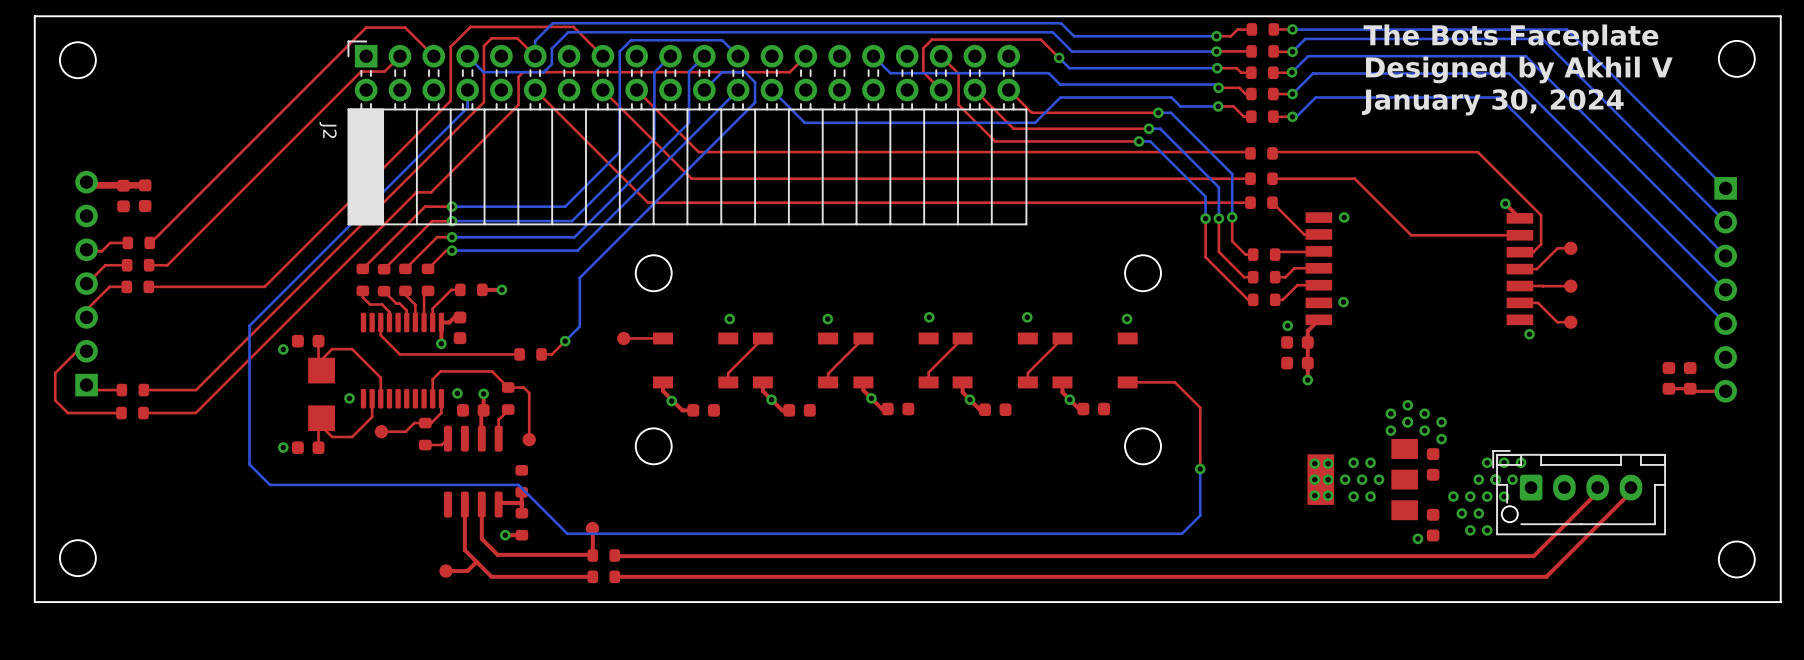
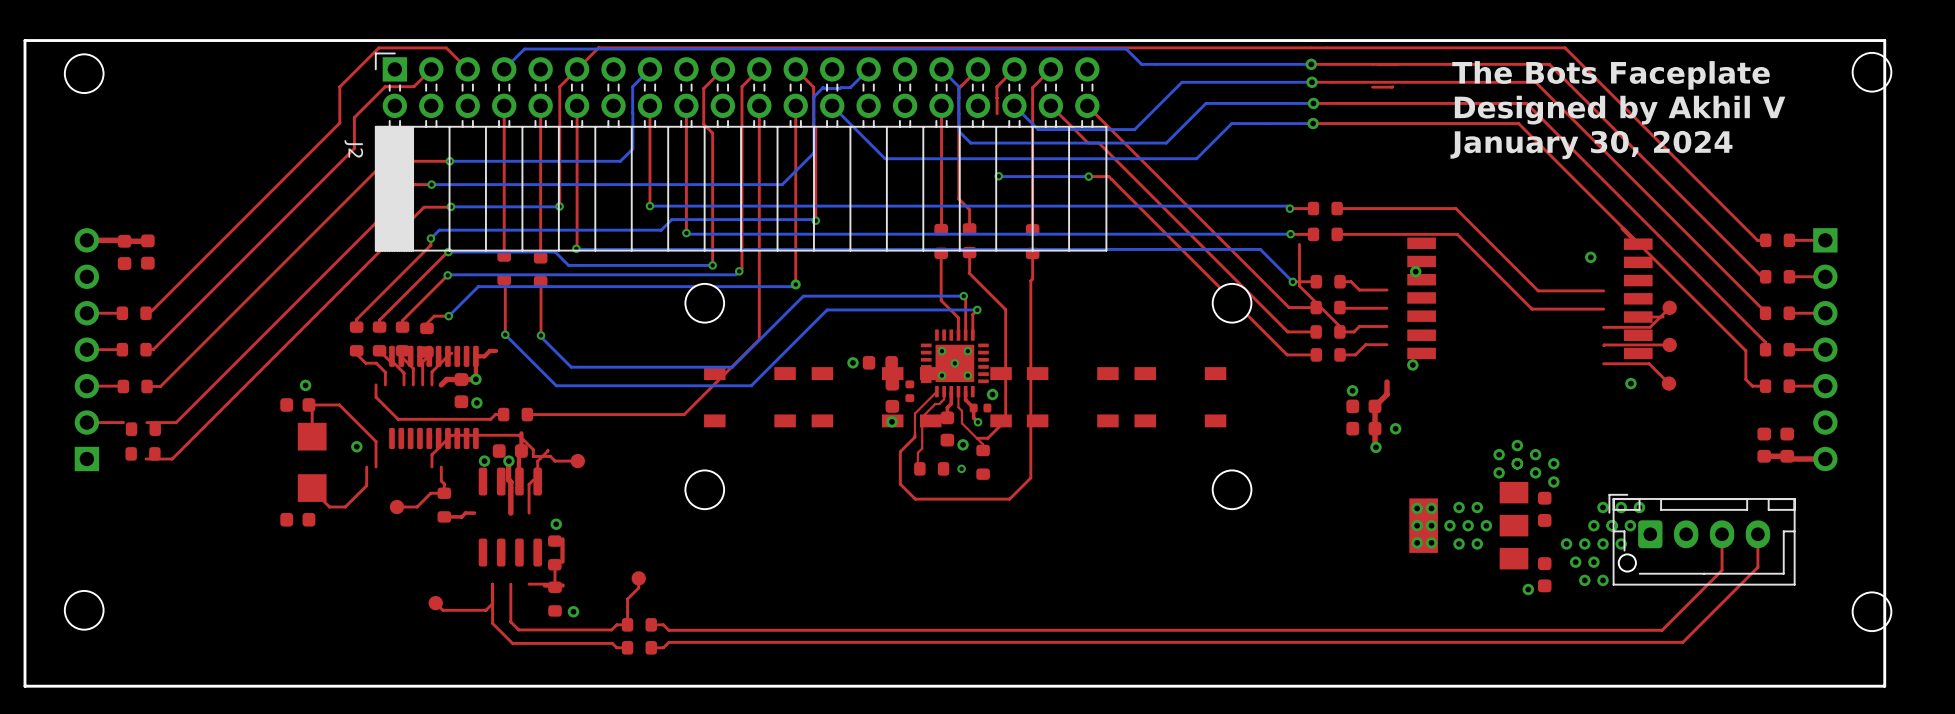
board edge: (1780, 16) (34, 16) (34, 602) (1780, 602) (1780, 16) -> (1884, 40) (1884, 686) (24, 686) (24, 40) (1884, 40)
top track: (1251, 29) (1237, 29) (1230, 36) -> (1765, 240) (1757, 240) (1565, 47) (1326, 47)
part: (1262, 29) -> none
bottom track: (1292, 29) (1566, 29) (1725, 188) -> none
via: (1292, 29) -> none
top track: (1296, 29) (1277, 29) -> none
top track: (413, 36) (405, 27) (366, 27) (149, 242) -> (446, 47) (378, 47) (339, 86) (339, 123) (149, 313) (146, 313)
top track: none -> (1311, 47) (598, 47) (559, 86) (559, 206)
bottom track: (1216, 36) (1074, 36) (1061, 23) (552, 23) (535, 40) (535, 56) -> none
via: (1216, 36) -> none
text position: The Bots Faceplate (1510, 37) -> The Bots Faceplate (1611, 75)
bottom track: (1072, 51) (1052, 32) (568, 32) (551, 48) (551, 64) (543, 72) (483, 72) (467, 56) -> (1155, 64) (1141, 64) (1126, 49) (524, 49) (504, 69)
top track: (1251, 51) (1216, 51) -> (1765, 276) (1761, 276) (1549, 64) (1311, 64)
part: (1262, 51) -> none
bottom track: (1292, 51) (1305, 38) (1542, 38) (1725, 222) -> none
via: (1292, 51) -> none
top track: (535, 56) (517, 38) (491, 38) (483, 45) (483, 102) (196, 390) (143, 390) -> none
top track: (602, 56) (573, 26) (470, 26) (450, 46) (450, 100) (264, 286) (148, 286) -> none
bottom track: none -> (649, 69) (632, 86) (632, 112)
top track: none -> (722, 69) (703, 88) (703, 124) (712, 133) (712, 265)
bottom track: (670, 56) (654, 72) (654, 138) (572, 221) (452, 221) -> none
top track: none -> (759, 69) (741, 86) (741, 268) (739, 271)
bottom track: (704, 56) (689, 71) (689, 122) (574, 237) (452, 237) -> none
top track: none -> (795, 69) (813, 87) (813, 125) (815, 128) (815, 220)
bottom track: (738, 56) (722, 40) (631, 40) (619, 51) (619, 152) (565, 206) (454, 206) -> none
top track: (805, 56) (789, 72) (523, 72) (518, 76) (518, 104) (431, 192) (416, 192) (195, 413) (143, 413) -> none
top track: none -> (977, 69) (958, 88) (958, 199) (969, 209) (969, 228)
top track: (941, 56) (958, 73) (958, 104) (995, 141) (1139, 141) -> (1014, 69) (996, 86) (996, 97)
top track: none -> (1050, 69) (1032, 87) (1032, 229)
top track: (1059, 57) (1040, 39) (931, 39) (923, 48) (923, 72) (941, 90) -> none
bottom track: (1059, 57) (1069, 68) (1096, 68) -> (1014, 105) (1038, 129) (1134, 129) (1181, 82)
via: (1059, 57) -> none
top track: (1236, 68) (1241, 72) (1251, 72) -> (1333, 82) (1535, 82) (1765, 313)
text position: Designed by Akhil V (1519, 69) -> Designed by Akhil V (1620, 110)
top track: (384, 71) (361, 71) (167, 265) (149, 265) -> (414, 85) (385, 86) (354, 117) (354, 148) (153, 349) (146, 349)
bottom track: (889, 72) (1048, 73) (1060, 84) (1215, 84) (1218, 87) -> (959, 113) (959, 131) (970, 143) (1166, 143) (1206, 103) (1313, 103)
bottom track: none -> (959, 86) (959, 97)
part: (1262, 72) -> none
bottom track: (1292, 72) (1308, 56) (1525, 56) (1725, 256) -> none
via: (1292, 72) -> none
bottom track: (755, 82) (744, 72) (722, 72) (704, 90) -> (813, 97) (823, 87) (850, 87) (868, 69)
bottom track: none -> (958, 97) (958, 113)
top track: none -> (997, 97) (997, 113)
top track: (1239, 87) (1245, 94) (1251, 94) (1250, 92) -> (1336, 103) (1526, 103) (1765, 342) (1765, 349)
top track: none -> (504, 105) (504, 256)
bottom track: (467, 90) (467, 107) (249, 325) (249, 464) (269, 484) (518, 484) (567, 533) (1182, 533) (1200, 515) (1200, 468) -> none
top track: none -> (540, 105) (540, 257)
top track: (535, 90) (647, 202) (1250, 202) -> (577, 105) (576, 248)
top track: (602, 90) (691, 178) (1250, 178) -> (649, 105) (649, 206)
top track: (636, 90) (698, 152) (1250, 153) -> (686, 105) (686, 233)
top track: none -> (759, 105) (759, 339) (684, 414) (527, 414)
top track: none -> (795, 105) (795, 284)
bottom track: (738, 90) (577, 250) (452, 250) -> none
top track: none -> (941, 105) (941, 229)
top track: (1008, 90) (1031, 112) (1158, 112) -> (1087, 105) (1289, 307) (1316, 307)
part: (1262, 94) -> none
bottom track: (1292, 94) (1313, 73) (1509, 73) (1725, 289) -> none
via: (1292, 94) -> none
top track: (1296, 94) (1274, 94) -> (1313, 208) (1290, 208)
bottom track: none -> (632, 113) (632, 148) (620, 161) (449, 161)
bottom track: (755, 102) (579, 277) (579, 326) (565, 341) -> (813, 119) (813, 152) (782, 184) (431, 184)
text position: January 30, 2024 (1492, 102) -> January 30, 2024 (1591, 145)
bottom track: (1180, 106) (1171, 97) (1060, 97) (1035, 122) (804, 122) -> (1272, 123) (1231, 123) (1196, 158) (885, 158) (867, 141)
top track: (1233, 106) (1243, 116) (1251, 116) -> (1329, 123) (1518, 123) (1745, 350) (1745, 379) (1752, 386) (1765, 386)
bottom track: (1158, 112) (1170, 112) (1232, 174) (1232, 217) -> none
via: (1158, 112) -> none
part: (1262, 116) -> none
via: (1292, 116) -> none
top track: (1296, 116) (1278, 116) -> none
bottom track: (1296, 116) (1315, 97) (1499, 97) (1725, 323) -> none
top track: (1009, 124) (1013, 128) (1149, 128) -> (1088, 143) (1098, 143) (1287, 331) (1316, 331)
bottom track: (1149, 128) (1160, 128) (1218, 187) (1218, 218) -> none
via: (1149, 128) -> none
top track: none -> (449, 161) (385, 161) (160, 386) (147, 386)
via: none -> (449, 161)
bottom track: (1139, 141) (1150, 141) (1205, 196) (1205, 218) -> none
via: (1139, 141) -> none
part: (1261, 153) -> none
top track: (1272, 153) (1477, 152) (1541, 215) (1541, 244) (1533, 252) (1519, 252) -> none
bottom track: none -> (998, 176) (1088, 176)
via: none -> (998, 176)
top track: none -> (1088, 176) (1108, 176) (1287, 354) (1316, 354)
via: none -> (1088, 176)
top track: none -> (431, 184) (414, 184) (176, 422) (146, 422)
via: none -> (431, 184)
part: (1261, 178) -> none
top track: (1272, 178) (1354, 178) (1411, 235) (1519, 235) -> none
top track: (86, 182) (89, 185) (145, 185) -> none
top track: none -> (450, 206) (424, 207) (172, 459) (146, 459)
via: none -> (450, 206)
bottom track: none -> (559, 206) (450, 206)
via: none -> (559, 206)
bottom track: none -> (649, 206) (1287, 206) (1289, 208)
via: none -> (649, 206)
via: none -> (1289, 208)
part: none -> (1325, 208)
top track: none -> (1337, 208) (1455, 208) (1538, 290) (1603, 290)
part: (145, 195) -> none
part: (123, 196) -> none
bottom track: none -> (815, 220) (671, 219) (661, 230) (439, 230) (430, 238)
via: none -> (815, 220)
part: (1261, 202) -> none
top track: (1272, 202) (1304, 234) (1318, 234) -> none
via position: (1505, 203) -> (1590, 257)
via: (452, 206) -> none
top track: (454, 206) (425, 206) (362, 268) -> none
bottom track: none -> (686, 233) (1290, 234)
via: none -> (686, 233)
top track: none -> (1290, 234) (1313, 234)
via: none -> (1290, 234)
part: none -> (1325, 234)
top track: none -> (1337, 234) (1457, 234) (1532, 309) (1603, 309)
top track: none -> (430, 238) (430, 245) (356, 319) (356, 327)
via: none -> (430, 238)
top track: none -> (86, 240) (147, 240)
part: none -> (1777, 240)
top track: none -> (1825, 240) (1789, 240)
part: none -> (941, 241)
part: none -> (969, 240)
part: none -> (1032, 241)
top track: (1232, 217) (1232, 241) (1245, 254) (1253, 254) -> none
via: (1232, 217) -> none
via: (1344, 217) -> none
via: (1205, 218) -> none
top track: (1218, 218) (1218, 251) (1244, 277) (1253, 277) -> none
via: (1218, 218) -> none
top track: (451, 221) (432, 221) (384, 269) -> none
via: (452, 221) -> none
bottom track: none -> (576, 248) (1260, 249) (1292, 281)
via: none -> (576, 248)
part: none -> (147, 252)
top track: none -> (448, 252) (379, 320) (379, 327)
bottom track: none -> (448, 252) (555, 252) (568, 265) (712, 265)
via: none -> (448, 252)
part: none -> (124, 252)
top track: none -> (941, 253) (941, 300) (958, 317) (958, 335)
top track: none -> (969, 252) (969, 273) (1005, 309) (1005, 420) (987, 438) (976, 438)
top track: none -> (1032, 253) (1032, 279) (1030, 280) (1030, 477) (1009, 499) (915, 499) (900, 484) (900, 451) (914, 437) (914, 413) (936, 391)
top track: (452, 237) (437, 237) (405, 268) -> none
via: (452, 237) -> none
via: none -> (712, 265)
part: none -> (504, 267)
top track: (127, 242) (110, 242) (101, 251) (88, 251) -> none
part: (138, 242) -> none
part: none -> (540, 269)
bottom track: none -> (739, 271) (735, 274) (447, 275)
via: none -> (739, 271)
via: none -> (1415, 271)
top track: none -> (447, 275) (402, 320) (402, 327)
via: none -> (447, 275)
top track: (1570, 248) (1557, 248) (1536, 269) (1519, 269) -> none
part: (1570, 248) -> none
part: none -> (1777, 276)
top track: none -> (1825, 276) (1789, 276)
top track: (446, 250) (428, 268) -> none
via: (452, 250) -> none
top track: none -> (504, 279) (505, 334)
top track: (1318, 251) (1277, 251) (1275, 254) -> none
top track: none -> (540, 281) (541, 335)
via: none -> (1292, 281)
top track: none -> (1316, 281) (1293, 281)
part: none -> (1328, 281)
top track: none -> (1340, 281) (1351, 281) (1359, 290) (1387, 290)
part: (1264, 254) -> none
bottom track: none -> (795, 284) (793, 286) (478, 286) (448, 316)
via: none -> (795, 284)
top track: (127, 265) (105, 265) (86, 283) (89, 286) -> none
part: (138, 265) -> none
top track: none -> (963, 296) (965, 298) (965, 335)
bottom track: none -> (963, 296) (803, 296) (732, 367) (571, 367) (541, 335)
via: none -> (963, 296)
top track: (1318, 268) (1294, 268) (1285, 277) (1275, 277) -> none
part: none -> (1328, 307)
top track: none -> (1339, 307) (1387, 308)
part: (1264, 277) -> none
top track: none -> (1669, 307) (1650, 327) (1603, 327)
part: none -> (1669, 307)
part: (362, 279) -> none
part: (405, 279) -> none
part: (428, 279) -> none
top track: none -> (977, 309) (972, 314) (972, 335)
bottom track: none -> (977, 309) (827, 309) (751, 385) (556, 385) (505, 334)
via: none -> (977, 309)
part: (384, 280) -> none
top track: none -> (122, 313) (86, 313)
part: none -> (134, 313)
part: none -> (1777, 313)
top track: none -> (1825, 313) (1789, 313)
part position: (86, 283) -> (86, 349)
top track: none -> (448, 316) (434, 316) (426, 323) (426, 328)
via: none -> (448, 316)
top track: (1318, 285) (1297, 285) (1282, 299) (1275, 299) -> none
top track: (126, 286) (109, 286) (86, 309) (86, 317) (88, 319) -> none
part: (137, 286) -> none
top track: (1570, 286) (1543, 286) -> none
part: (1570, 286) -> none
top track: (460, 289) (451, 289) (432, 308) (432, 322) -> none
part: (471, 289) -> none
top track: (501, 289) (482, 289) -> none
via: (501, 289) -> none
part position: (1725, 289) -> (1825, 349)
top track: (362, 290) (362, 297) (370, 304) (382, 304) (389, 311) (389, 322) -> none
top track: (405, 290) (405, 294) (415, 304) (415, 322) -> none
top track: (428, 290) (424, 294) (424, 322) -> none
top track: (384, 291) (406, 310) (406, 322) -> none
top track: none -> (1387, 326) (1359, 326) (1354, 331) (1350, 331)
part: none -> (1328, 331)
part: (1264, 299) -> none
via: none -> (505, 334)
via: (1343, 302) -> none
top track: (1519, 302) (1538, 302) (1557, 322) (1570, 322) -> none
via: none -> (541, 335)
part: none -> (356, 338)
part: none -> (379, 338)
part: none -> (402, 338)
part: none -> (426, 340)
top track: none -> (1387, 344) (1365, 344) (1355, 354) (1340, 354)
top track: none -> (1669, 344) (1603, 345)
part: none -> (1669, 344)
top track: none -> (122, 349) (86, 349)
part: none -> (134, 349)
part: none -> (1777, 349)
top track: none -> (1825, 349) (1789, 349)
top track: none -> (356, 350) (356, 354) (365, 363) (376, 363) (385, 372) (385, 384)
top track: none -> (379, 350) (404, 373) (404, 384)
top track: none -> (402, 350) (402, 357) (413, 368) (413, 384)
via: (929, 317) -> none
via: (1027, 317) -> none
top track: none -> (426, 352) (426, 357) (422, 361) (422, 384)
top track: none -> (451, 353) (431, 371) (431, 384)
via: (729, 319) -> none
via: (827, 319) -> none
via: (1127, 319) -> none
top track: (1318, 319) (1307, 330) (1307, 380) -> none
part: none -> (1328, 354)
top track: (380, 322) (380, 335) (399, 354) (519, 354) -> none
part: (1570, 322) -> none
via: (1287, 325) -> none
part position: (460, 327) -> (461, 390)
via: none -> (852, 362)
part: none -> (880, 362)
part: none -> (954, 363)
top track: none -> (1603, 363) (1649, 363) (1668, 383)
via: none -> (1412, 364)
via position: (1529, 334) -> (1630, 383)
part: (623, 338) -> none
top track: (663, 338) (623, 338) -> none
top track: (762, 338) (728, 373) (728, 382) -> none
top track: (863, 338) (828, 373) (828, 382) -> none
top track: (962, 338) (928, 372) (928, 382) -> none
top track: (1062, 338) (1027, 373) (1027, 382) -> none
part position: (308, 341) -> (297, 404)
top track: (318, 341) (318, 367) (321, 370) (321, 359) (332, 349) (352, 349) (380, 377) (380, 398) -> none
top track: (565, 341) (551, 354) (541, 354) -> none
via: (565, 341) -> none
part: (1297, 342) -> none
top track: none -> (475, 379) (446, 379) (441, 384)
top track: none -> (1387, 382) (1387, 394) (1375, 406) (1375, 447)
part: none -> (1668, 383)
top track: none -> (376, 384) (376, 397) (398, 419) (490, 419) (495, 414) (503, 414)
top track: none -> (86, 386) (123, 386)
part: none -> (135, 386)
part: none -> (1777, 386)
top track: none -> (1825, 386) (1789, 386)
top track: (88, 352) (77, 351) (55, 373) (55, 400) (67, 413) (121, 413) -> none
part: (530, 354) -> none
part: none -> (909, 391)
via: none -> (1352, 390)
top track: none -> (944, 391) (944, 399) (939, 404) (935, 404) (922, 417) (922, 448) (917, 452) (917, 466) (919, 468)
top track: none -> (951, 391) (951, 403) (947, 407) (947, 417)
top track: none -> (958, 391) (958, 407) (961, 410) (961, 423) (983, 444) (983, 450)
top track: none -> (965, 391) (965, 399) (973, 408) (973, 417) (977, 422)
via: none -> (992, 394)
part: none -> (892, 395)
part: (1297, 363) -> none
via: none -> (476, 402)
part: none -> (1363, 406)
part: none -> (980, 408)
part: none -> (515, 414)
part: (1668, 378) -> none
part: (1690, 378) -> none
via position: (1307, 380) -> (1395, 428)
top track: (663, 382) (663, 391) (671, 401) (682, 410) (693, 410) -> none
top track: (762, 382) (762, 391) (782, 410) (789, 410) -> none
top track: (863, 382) (863, 390) (882, 409) (887, 409) -> none
top track: (962, 382) (962, 392) (979, 409) (984, 409) -> none
top track: (1062, 382) (1062, 392) (1079, 409) (1083, 409) -> none
top track: (1127, 382) (1174, 382) (1200, 407) (1200, 468) -> none
top track: none -> (123, 422) (86, 422)
via: none -> (891, 421)
via: none -> (977, 422)
top track: (86, 385) (91, 390) (121, 390) -> none
top track: (1668, 388) (1725, 391) -> (1764, 456) (1787, 456) (1789, 459) (1825, 459)
part: none -> (1363, 428)
via: (457, 393) -> none
via: (483, 393) -> none
part position: (321, 394) -> (312, 462)
top track: none -> (312, 436) (312, 408) (308, 404) (339, 404) (376, 441) (376, 467)
via position: (349, 398) -> (356, 446)
top track: (372, 398) (372, 417) (352, 437) (332, 437) (321, 426) (321, 418) (318, 421) (318, 447) -> none
top track: (432, 398) (432, 379) (440, 371) (492, 371) (508, 387) (523, 387) (529, 393) (529, 439) -> none
top track: (441, 398) (441, 412) (431, 423) (414, 423) (405, 431) (381, 431) -> none
part: (508, 398) -> none
via position: (871, 398) -> (963, 444)
via: (771, 399) -> none
via: (969, 399) -> none
via: (1069, 399) -> none
via: (671, 401) -> none
part: none -> (1764, 445)
part: none -> (1787, 445)
via: none -> (1375, 447)
part rotation: 0° (898, 409) -> 90° clockwise (947, 428)
part position: (898, 409) -> (947, 428)
part: (995, 409) -> none
part: (1093, 409) -> none
part: (703, 410) -> none
part: (799, 410) -> none
via: none -> (484, 461)
top track: none -> (508, 461) (510, 513)
via: none -> (508, 461)
top track: none -> (577, 461) (555, 461) (550, 456) (533, 456) (533, 449) (518, 435) (451, 435) (431, 454) (431, 467)
part: none -> (983, 462)
top track: none -> (366, 467) (366, 485) (345, 507) (329, 507) (312, 489)
top track: none -> (441, 467) (441, 481) (444, 484) (444, 493) (430, 493) (417, 507) (396, 507)
part: none -> (931, 468)
via: none -> (961, 468)
part position: (381, 431) -> (396, 507)
part position: (425, 434) -> (444, 505)
top track: none -> (533, 480) (529, 484) (529, 513)
top track: (447, 438) (441, 444) (425, 444) -> none
part position: (529, 439) -> (577, 461)
via: (283, 447) -> none
part position: (308, 447) -> (297, 519)
top track: none -> (474, 513) (465, 513) (461, 517)
via: (1200, 468) -> none
top track: none -> (461, 516) (444, 516)
via: none -> (556, 524)
part: (521, 481) -> none
top track: (1597, 492) (1533, 556) (614, 555) -> (1722, 539) (1722, 570) (1662, 630) (668, 630) (663, 624) (651, 624)
top track: (1630, 492) (1546, 576) (614, 576) -> (1757, 539) (1757, 567) (1682, 642) (668, 642) (663, 647) (651, 647)
top track: (464, 504) (464, 550) (491, 576) (592, 576) -> none
top track: (481, 504) (481, 538) (497, 554) (592, 555) (592, 528) -> (510, 584) (510, 622) (518, 629) (611, 629) (616, 624) (627, 624) (627, 599) (638, 587) (638, 578)
part: none -> (554, 552)
top track: (521, 504) (521, 502) (500, 502) (499, 505) -> none
top track: none -> (555, 564) (555, 587) (551, 584) (529, 584)
part: (521, 524) -> none
top track: none -> (492, 584) (492, 623) (512, 643) (612, 643) (616, 647) (627, 647)
via: (505, 535) -> none
part: none -> (555, 599)
top track: none -> (435, 603) (442, 610) (485, 610) (492, 603)
part: (603, 555) -> none
via: none -> (573, 611)
top track: (476, 561) (467, 571) (446, 571) -> none
part position: (446, 571) -> (435, 603)
part: none -> (639, 624)
part: (603, 576) -> none
part: none -> (639, 647)

